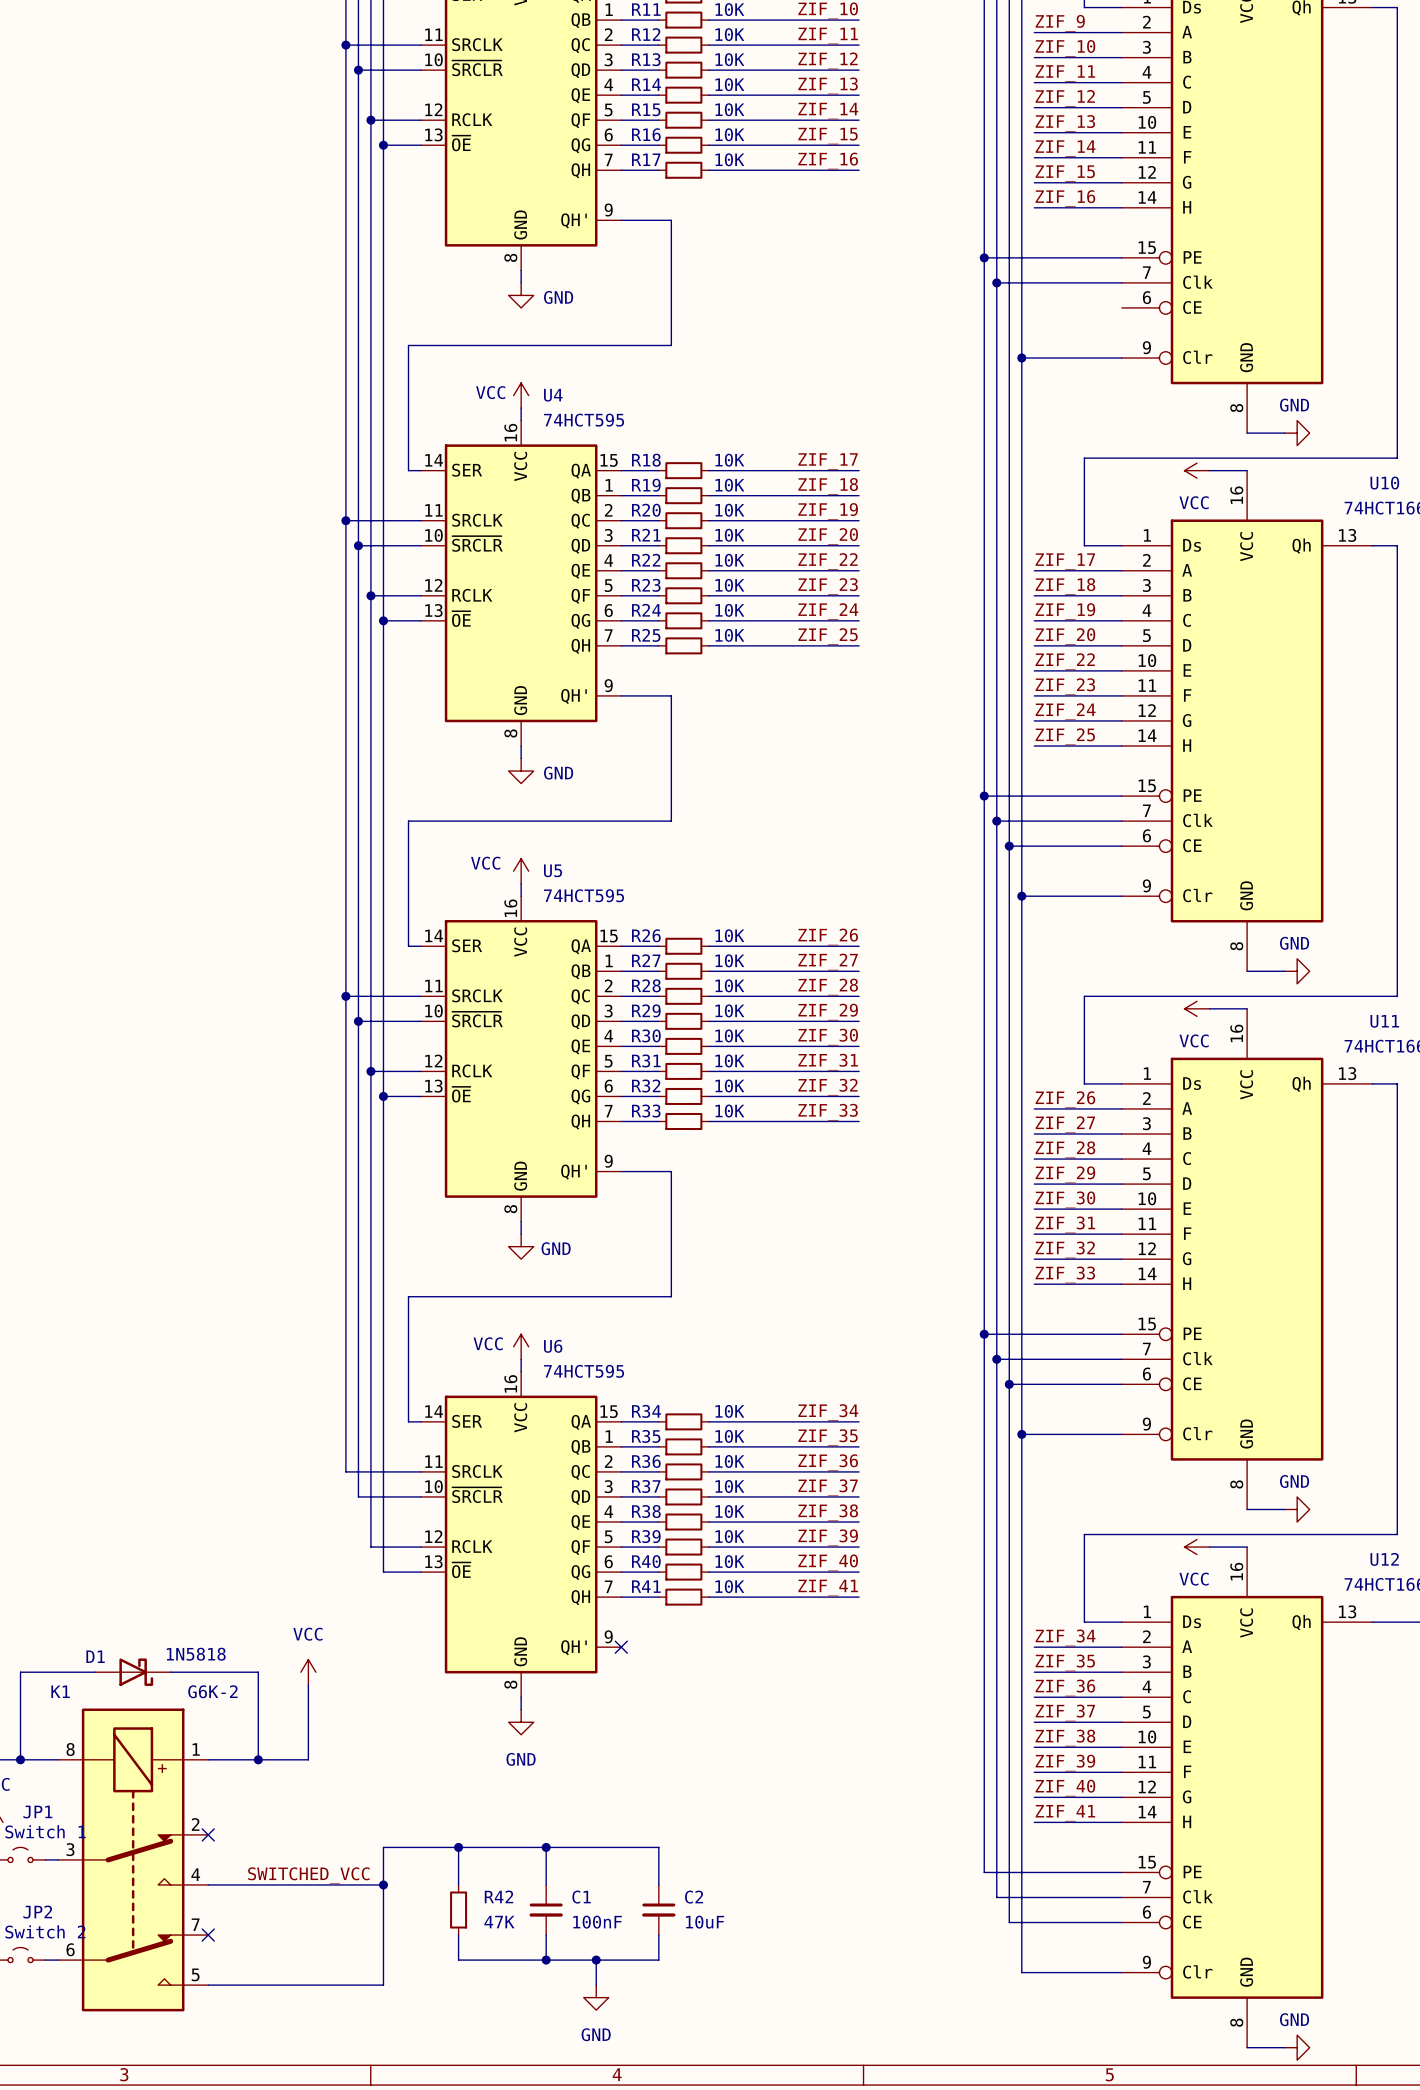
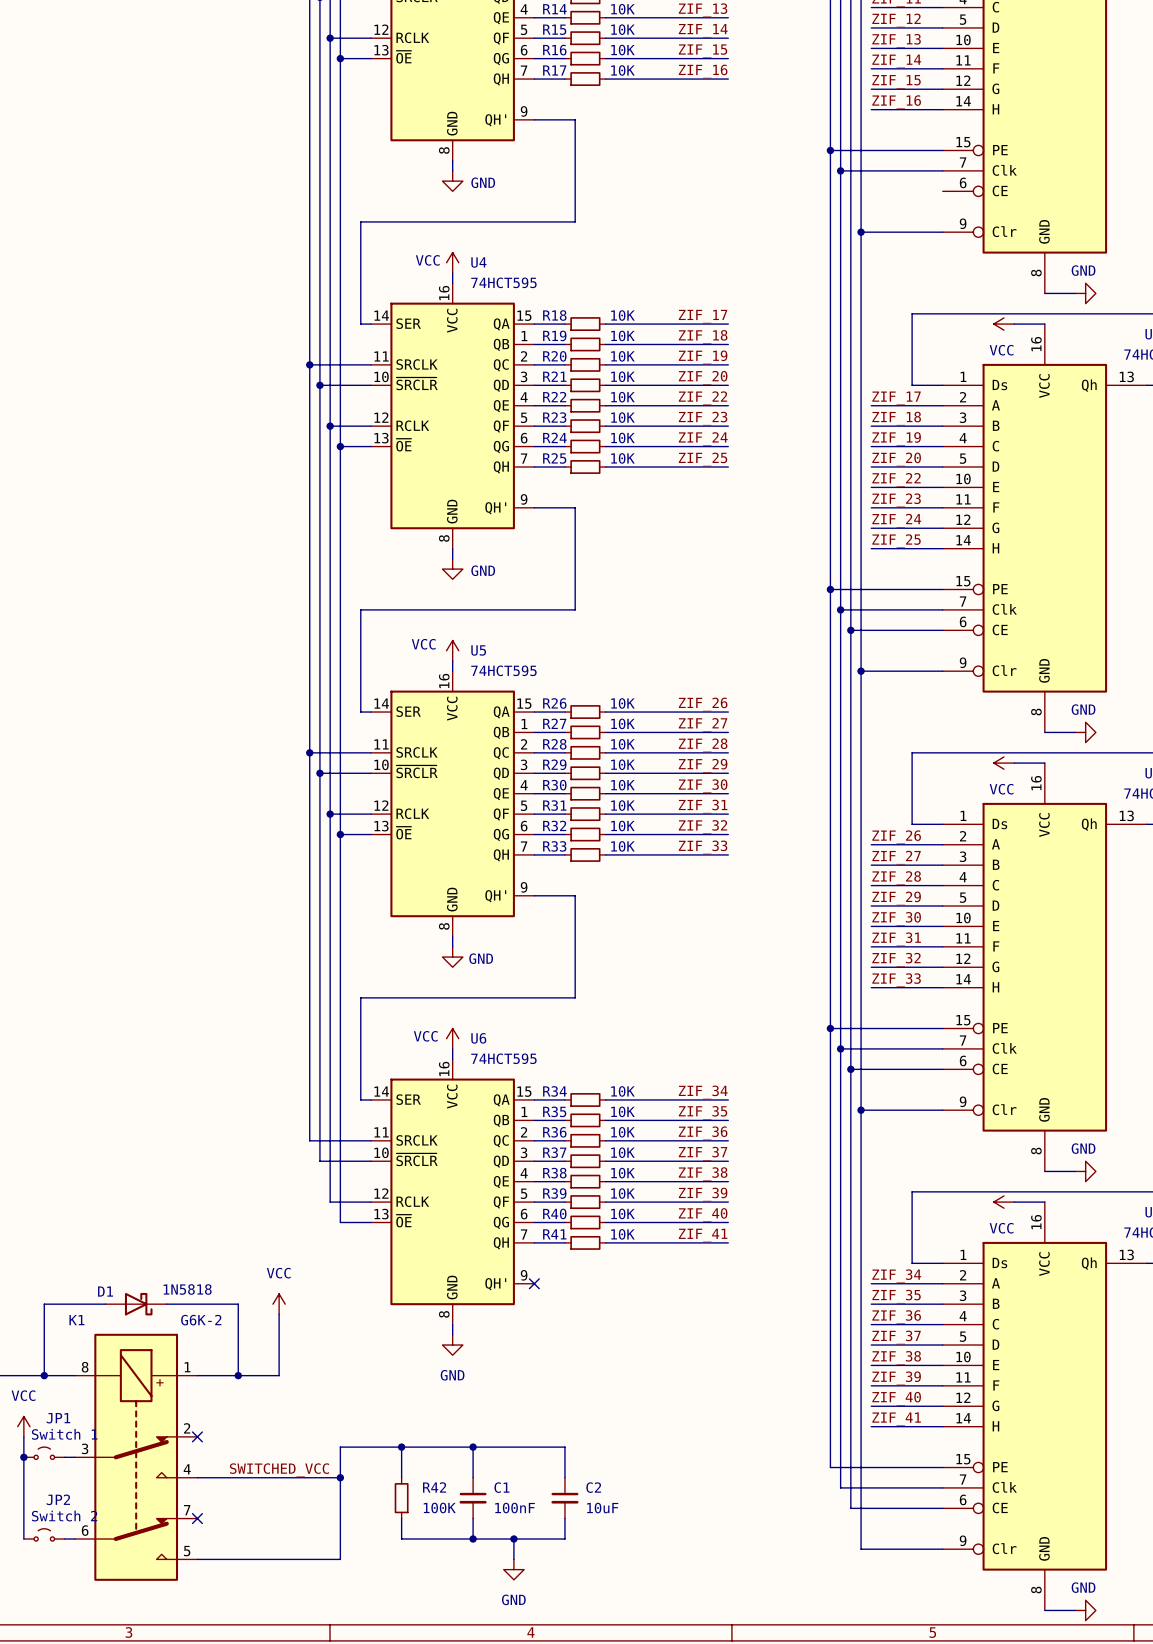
R42 value: 47K (499, 1922) -> 100K (439, 1507)

